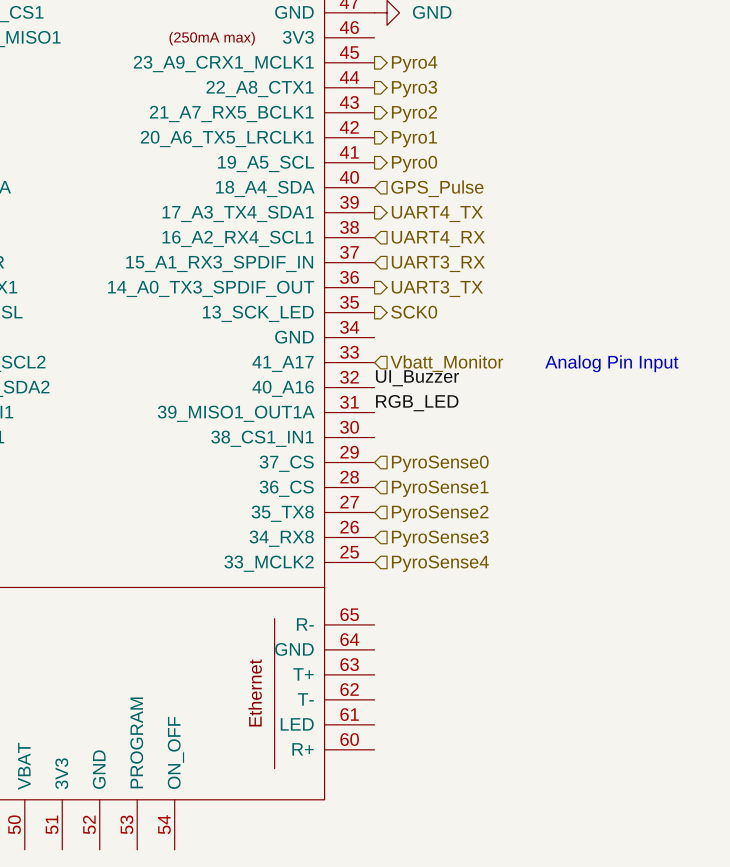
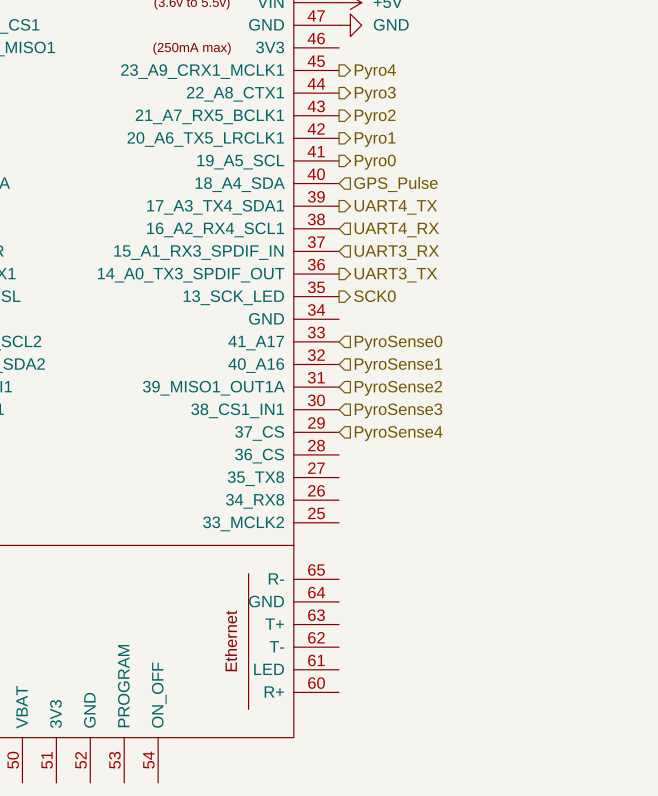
hierarchical label: Vbatt_Monitor (446, 363) -> PyroSense0 (398, 343)
text: Analog Pin Input (611, 363) -> none
label: UI_Buzzer (417, 378) -> none
label: RGB_LED (417, 403) -> none
hierarchical label: PyroSense0 (440, 463) -> PyroSense4 (398, 433)
hierarchical label position: PyroSense1 (440, 488) -> PyroSense1 (398, 365)
hierarchical label position: PyroSense2 (440, 513) -> PyroSense2 (398, 388)
hierarchical label position: PyroSense3 (440, 538) -> PyroSense3 (398, 410)
hierarchical label: PyroSense4 (440, 563) -> none

